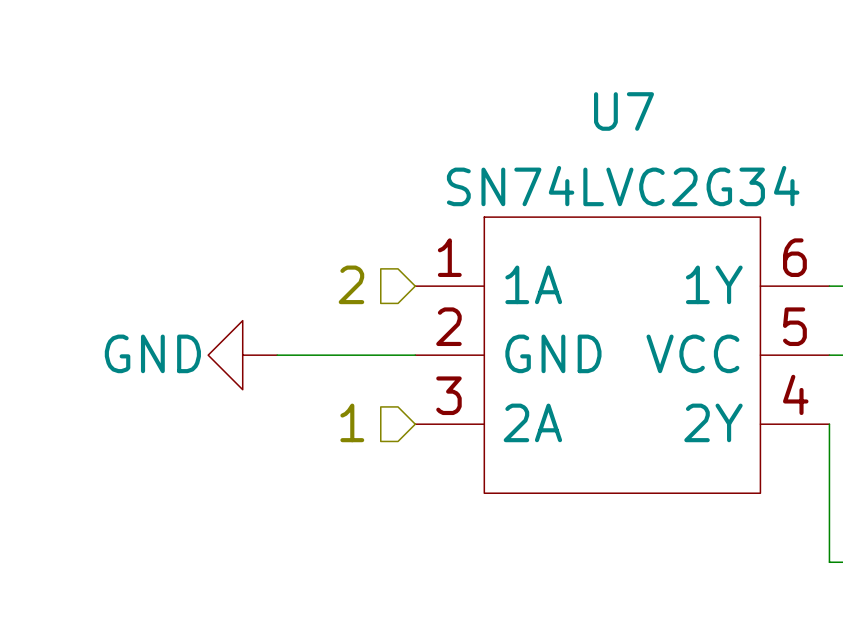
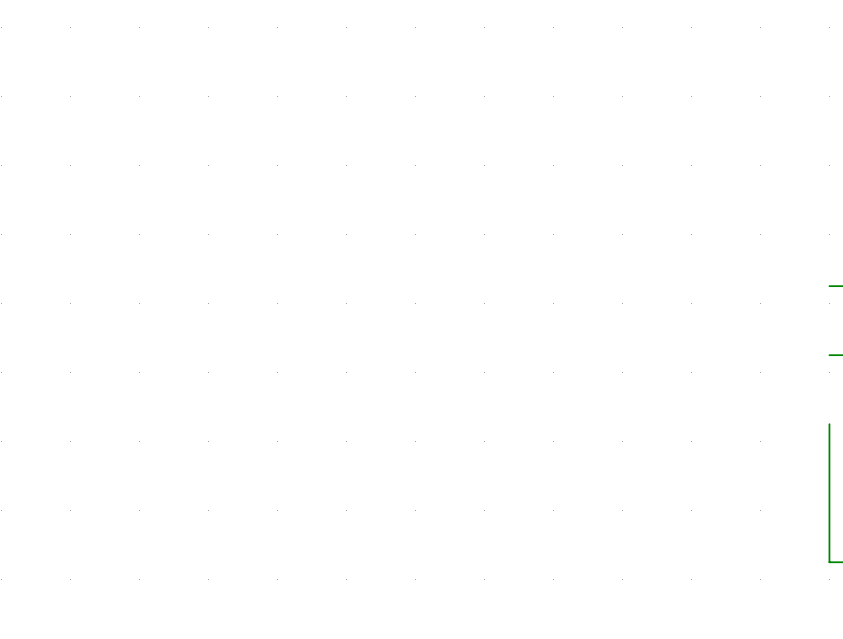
hierarchical label: 2 (351, 284) -> none
power symbol: GND (242, 355) -> none
wire: (277, 355) (415, 355) -> none
U7: SN74LVC2G34 (622, 355) -> none
hierarchical label: 1 (352, 422) -> none

